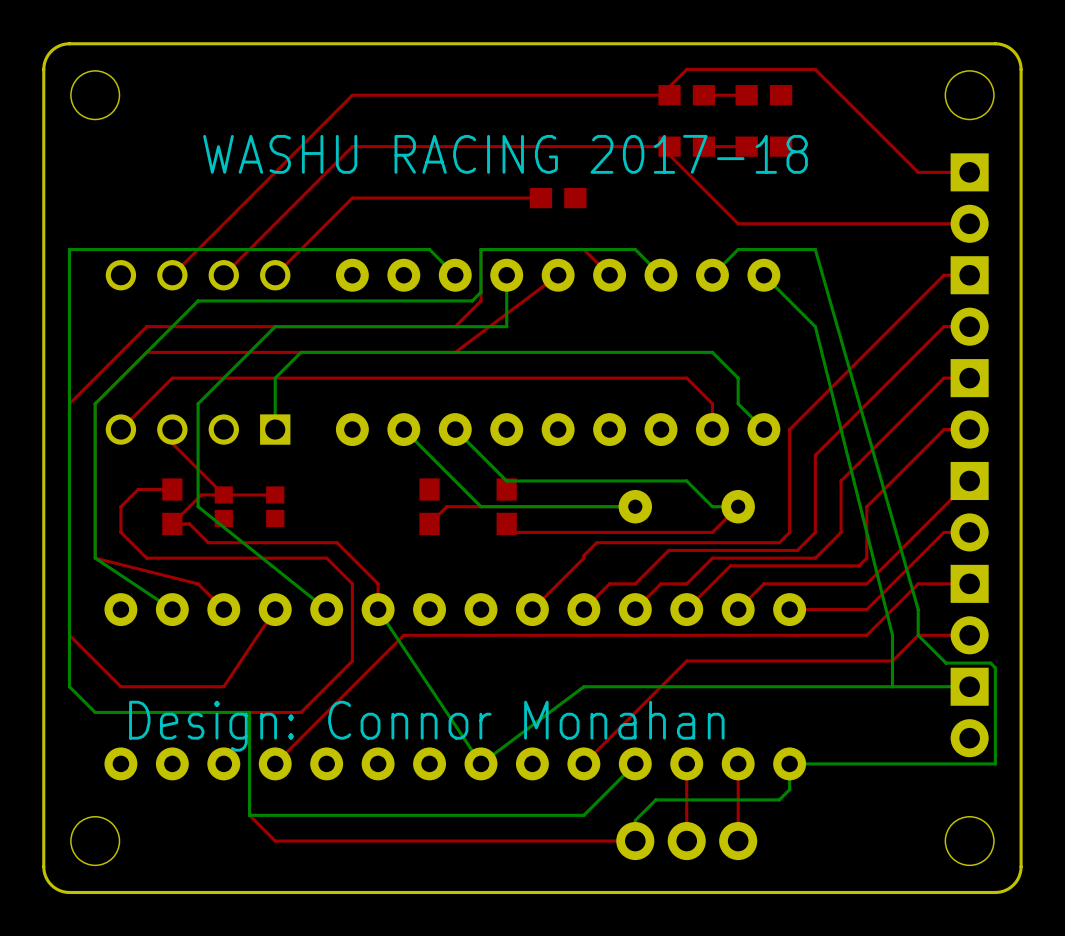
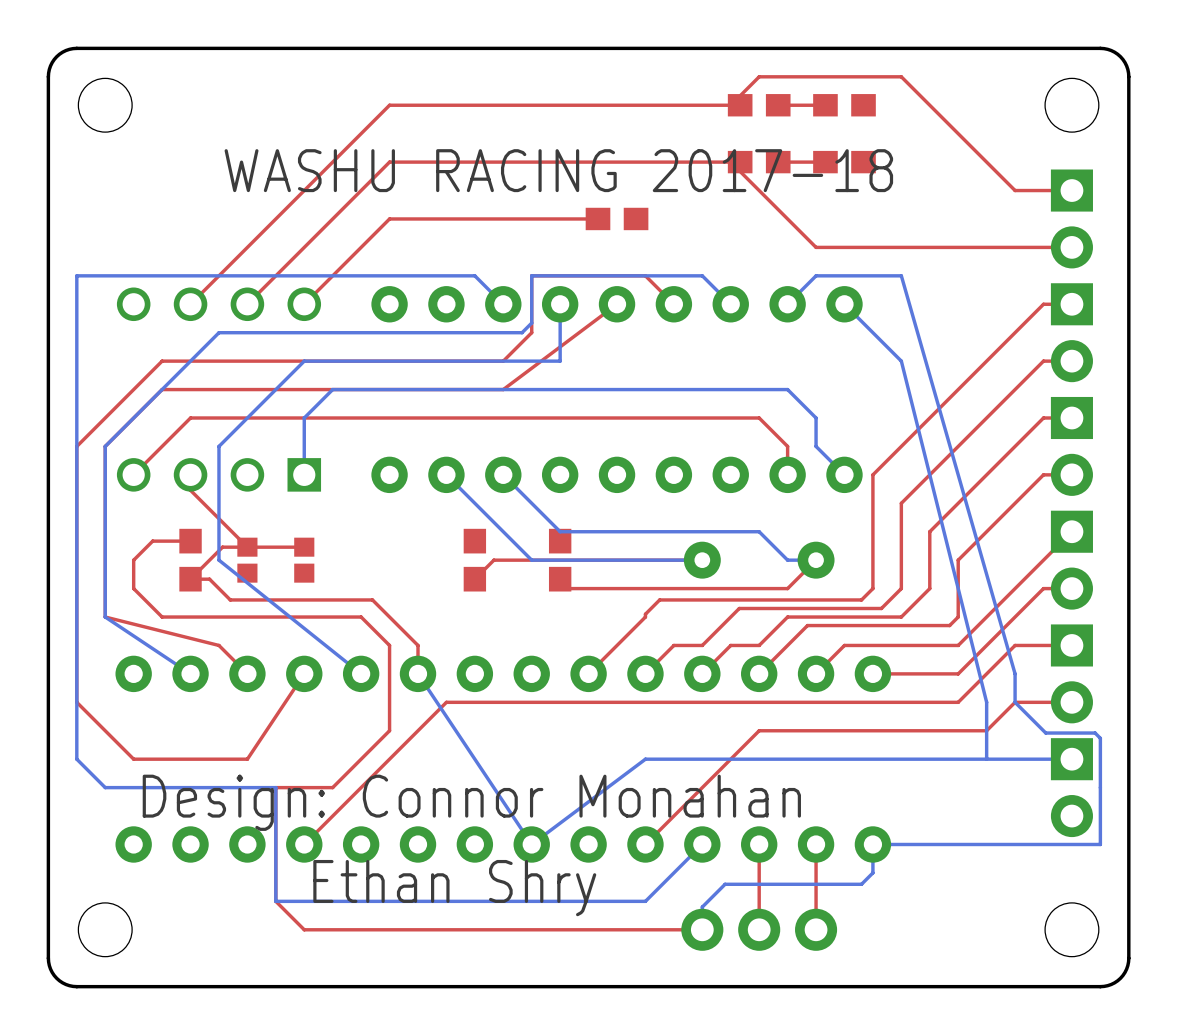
text: none -> Ethan Shry (454, 888)

